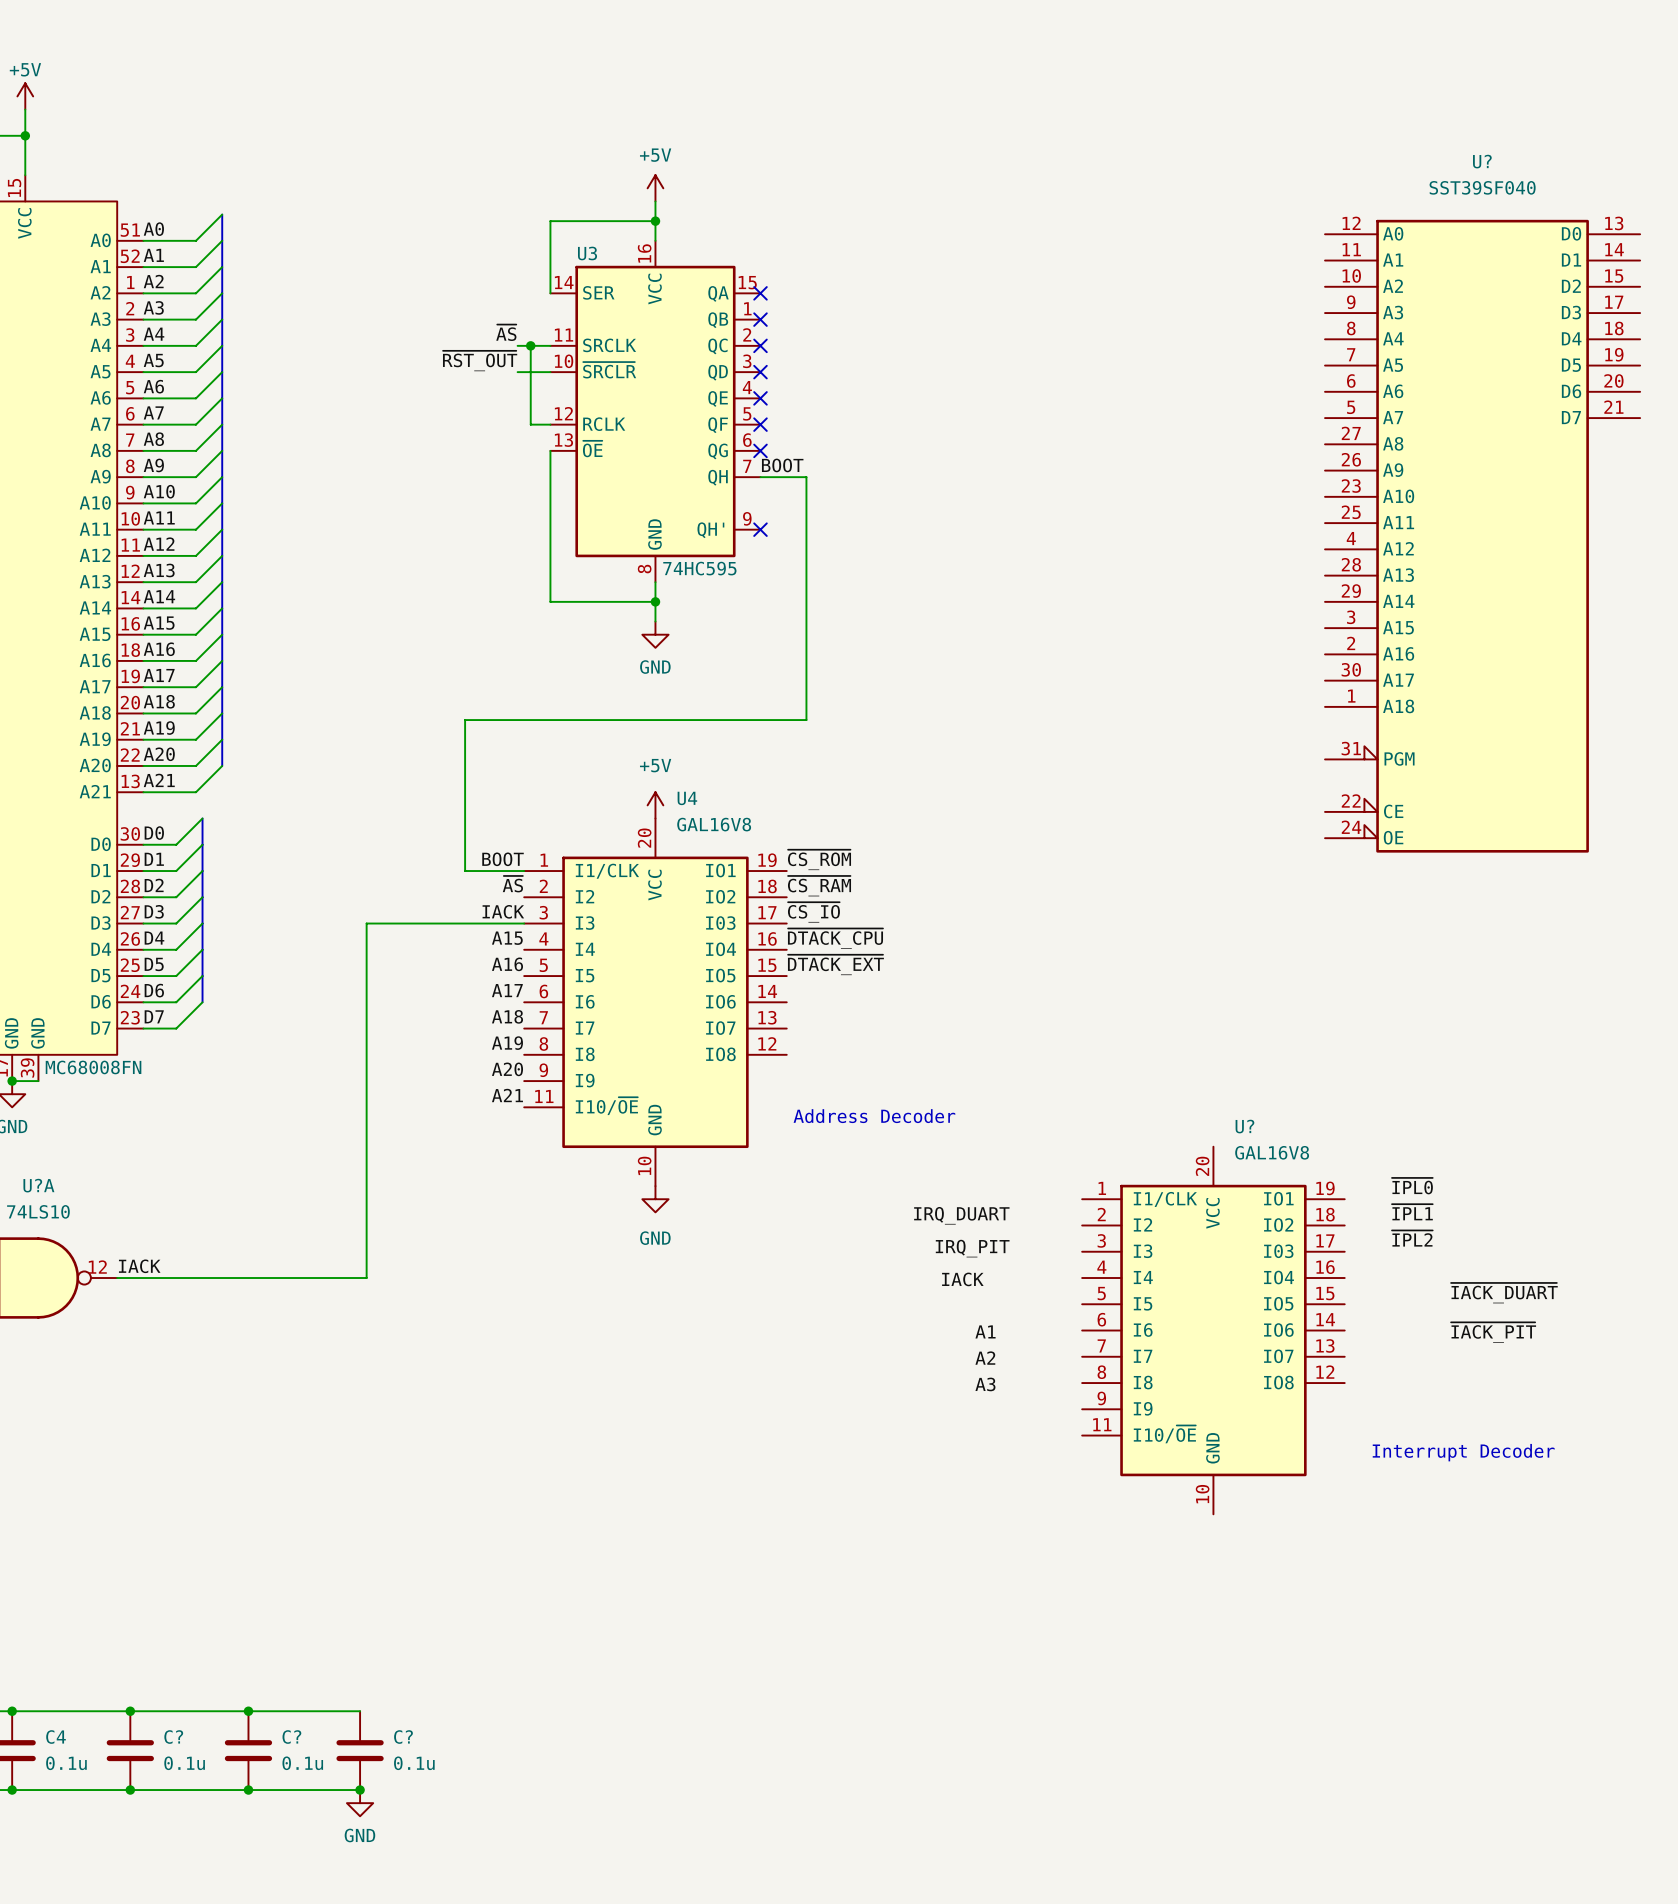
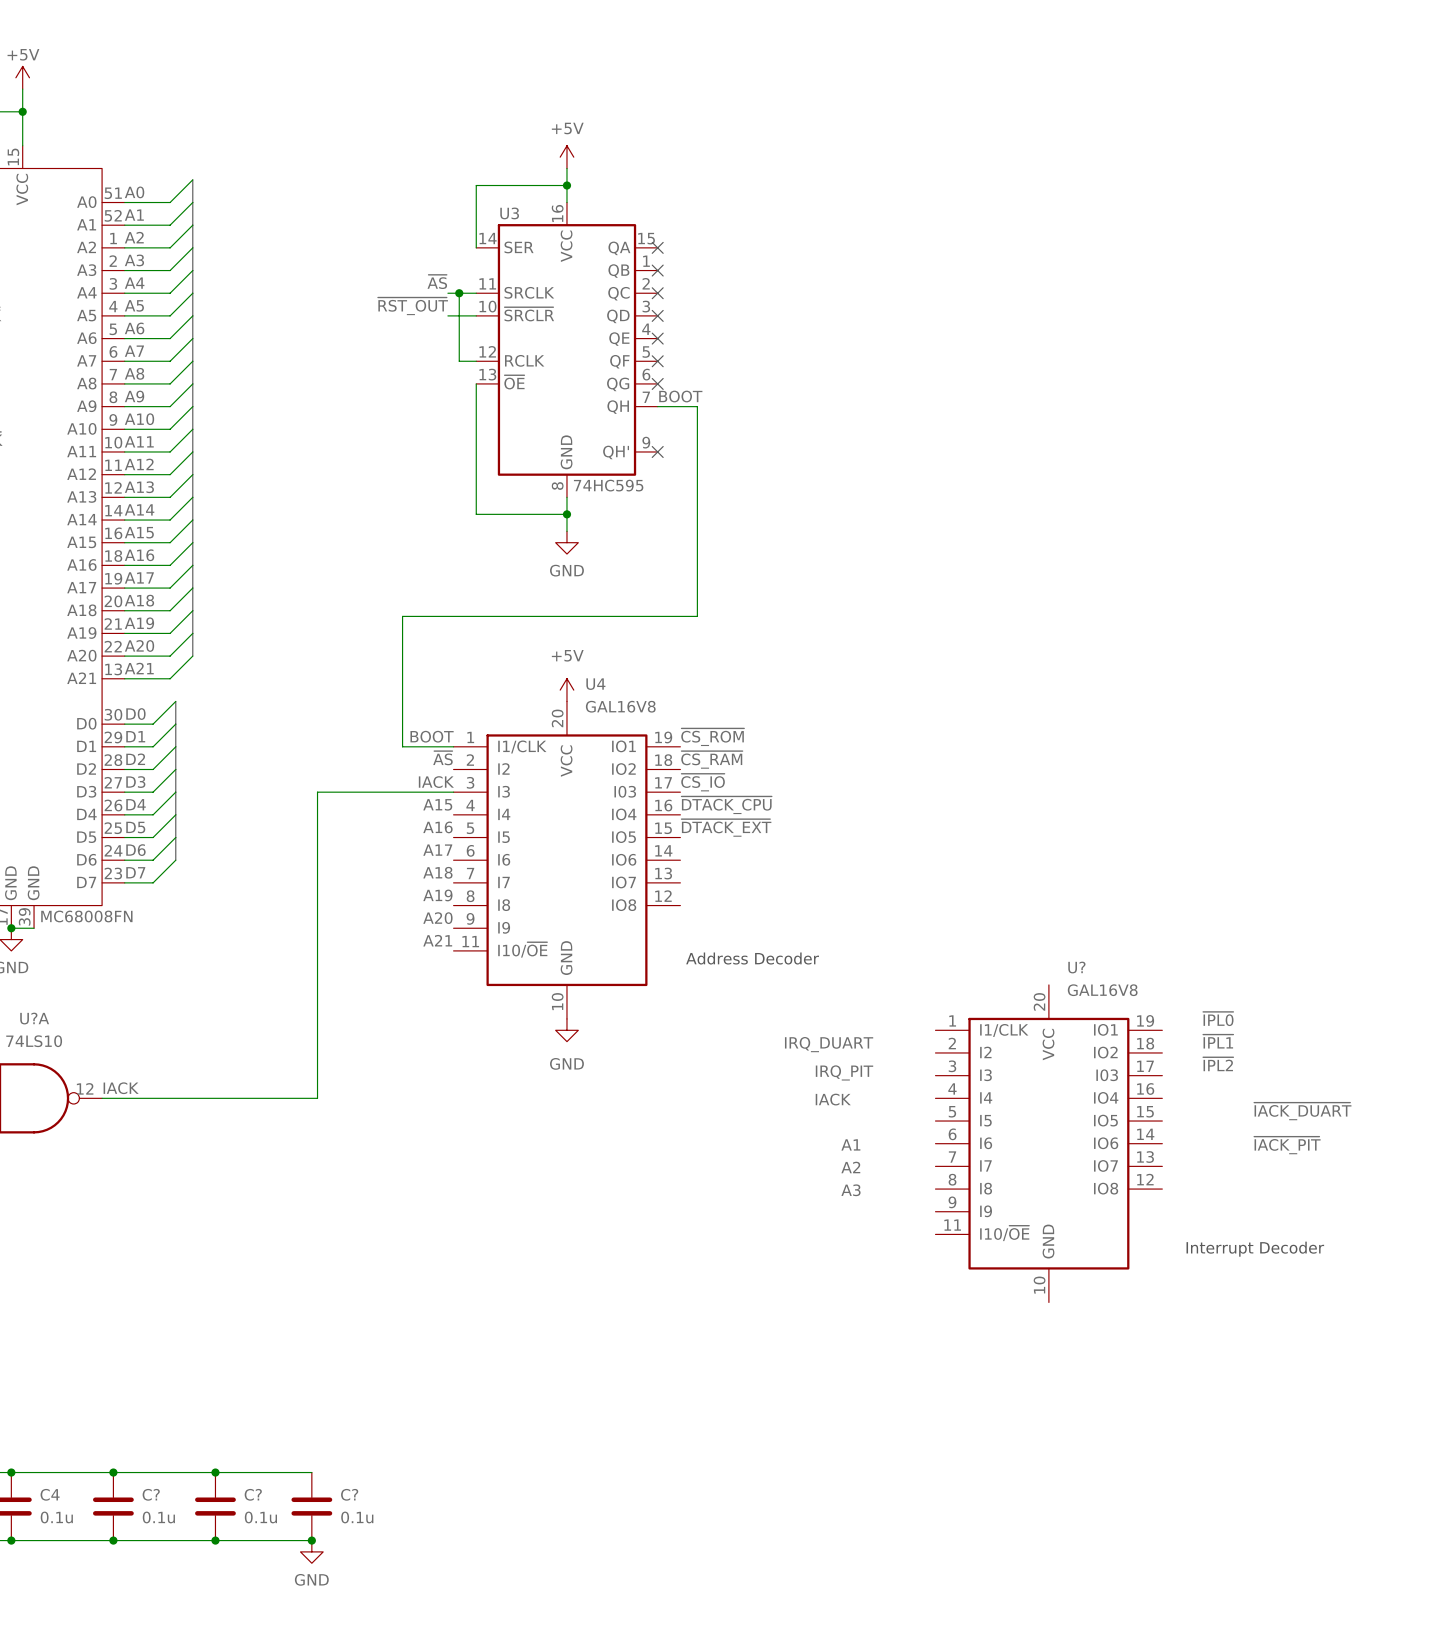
U?: SST39SF040 (1482, 536) -> none

